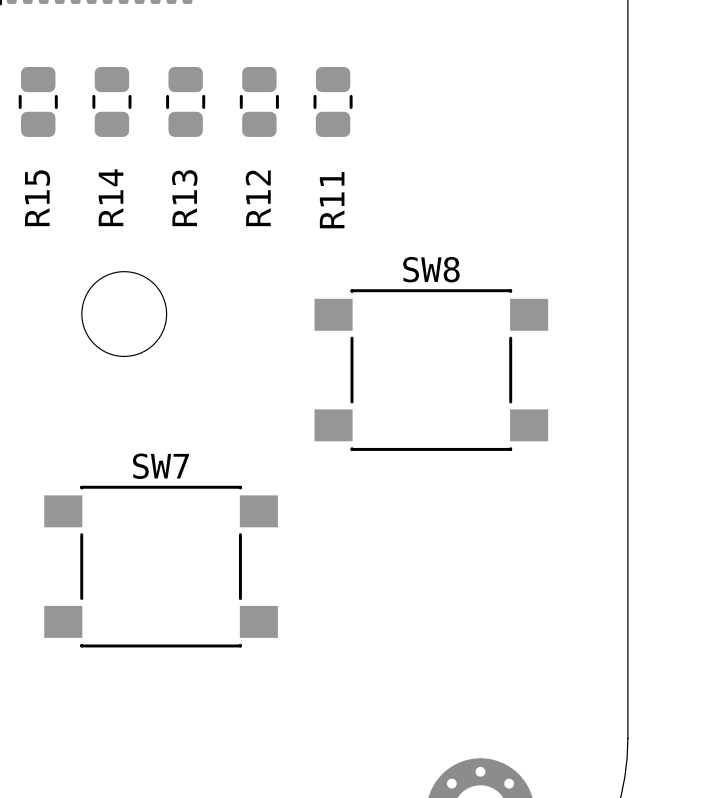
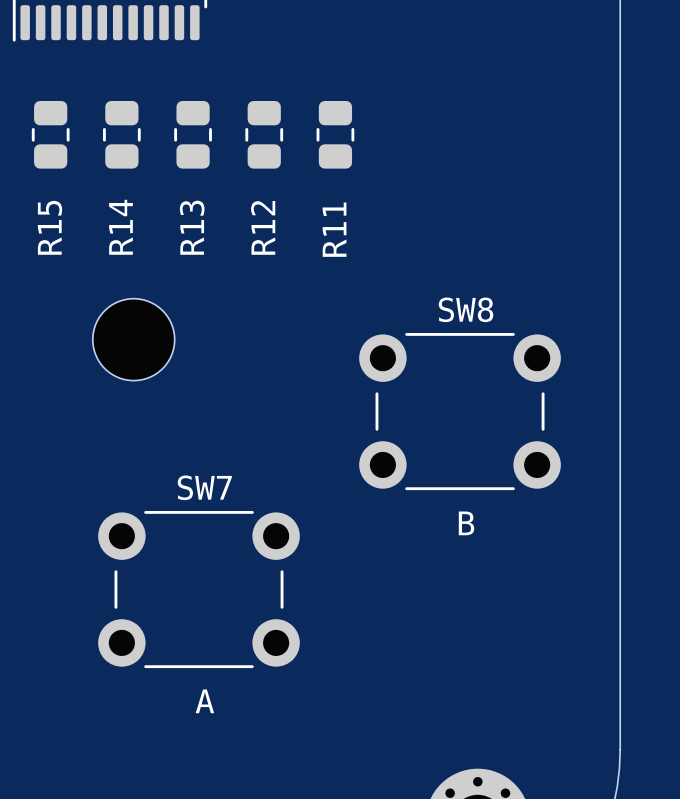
SW8 footprint: [314, 289, 549, 451] -> [359, 333, 561, 491]
SW7 footprint: [44, 485, 278, 648] -> [98, 510, 300, 669]
SW8 value: none -> B (466, 523)
SW7 value: none -> A (204, 701)

